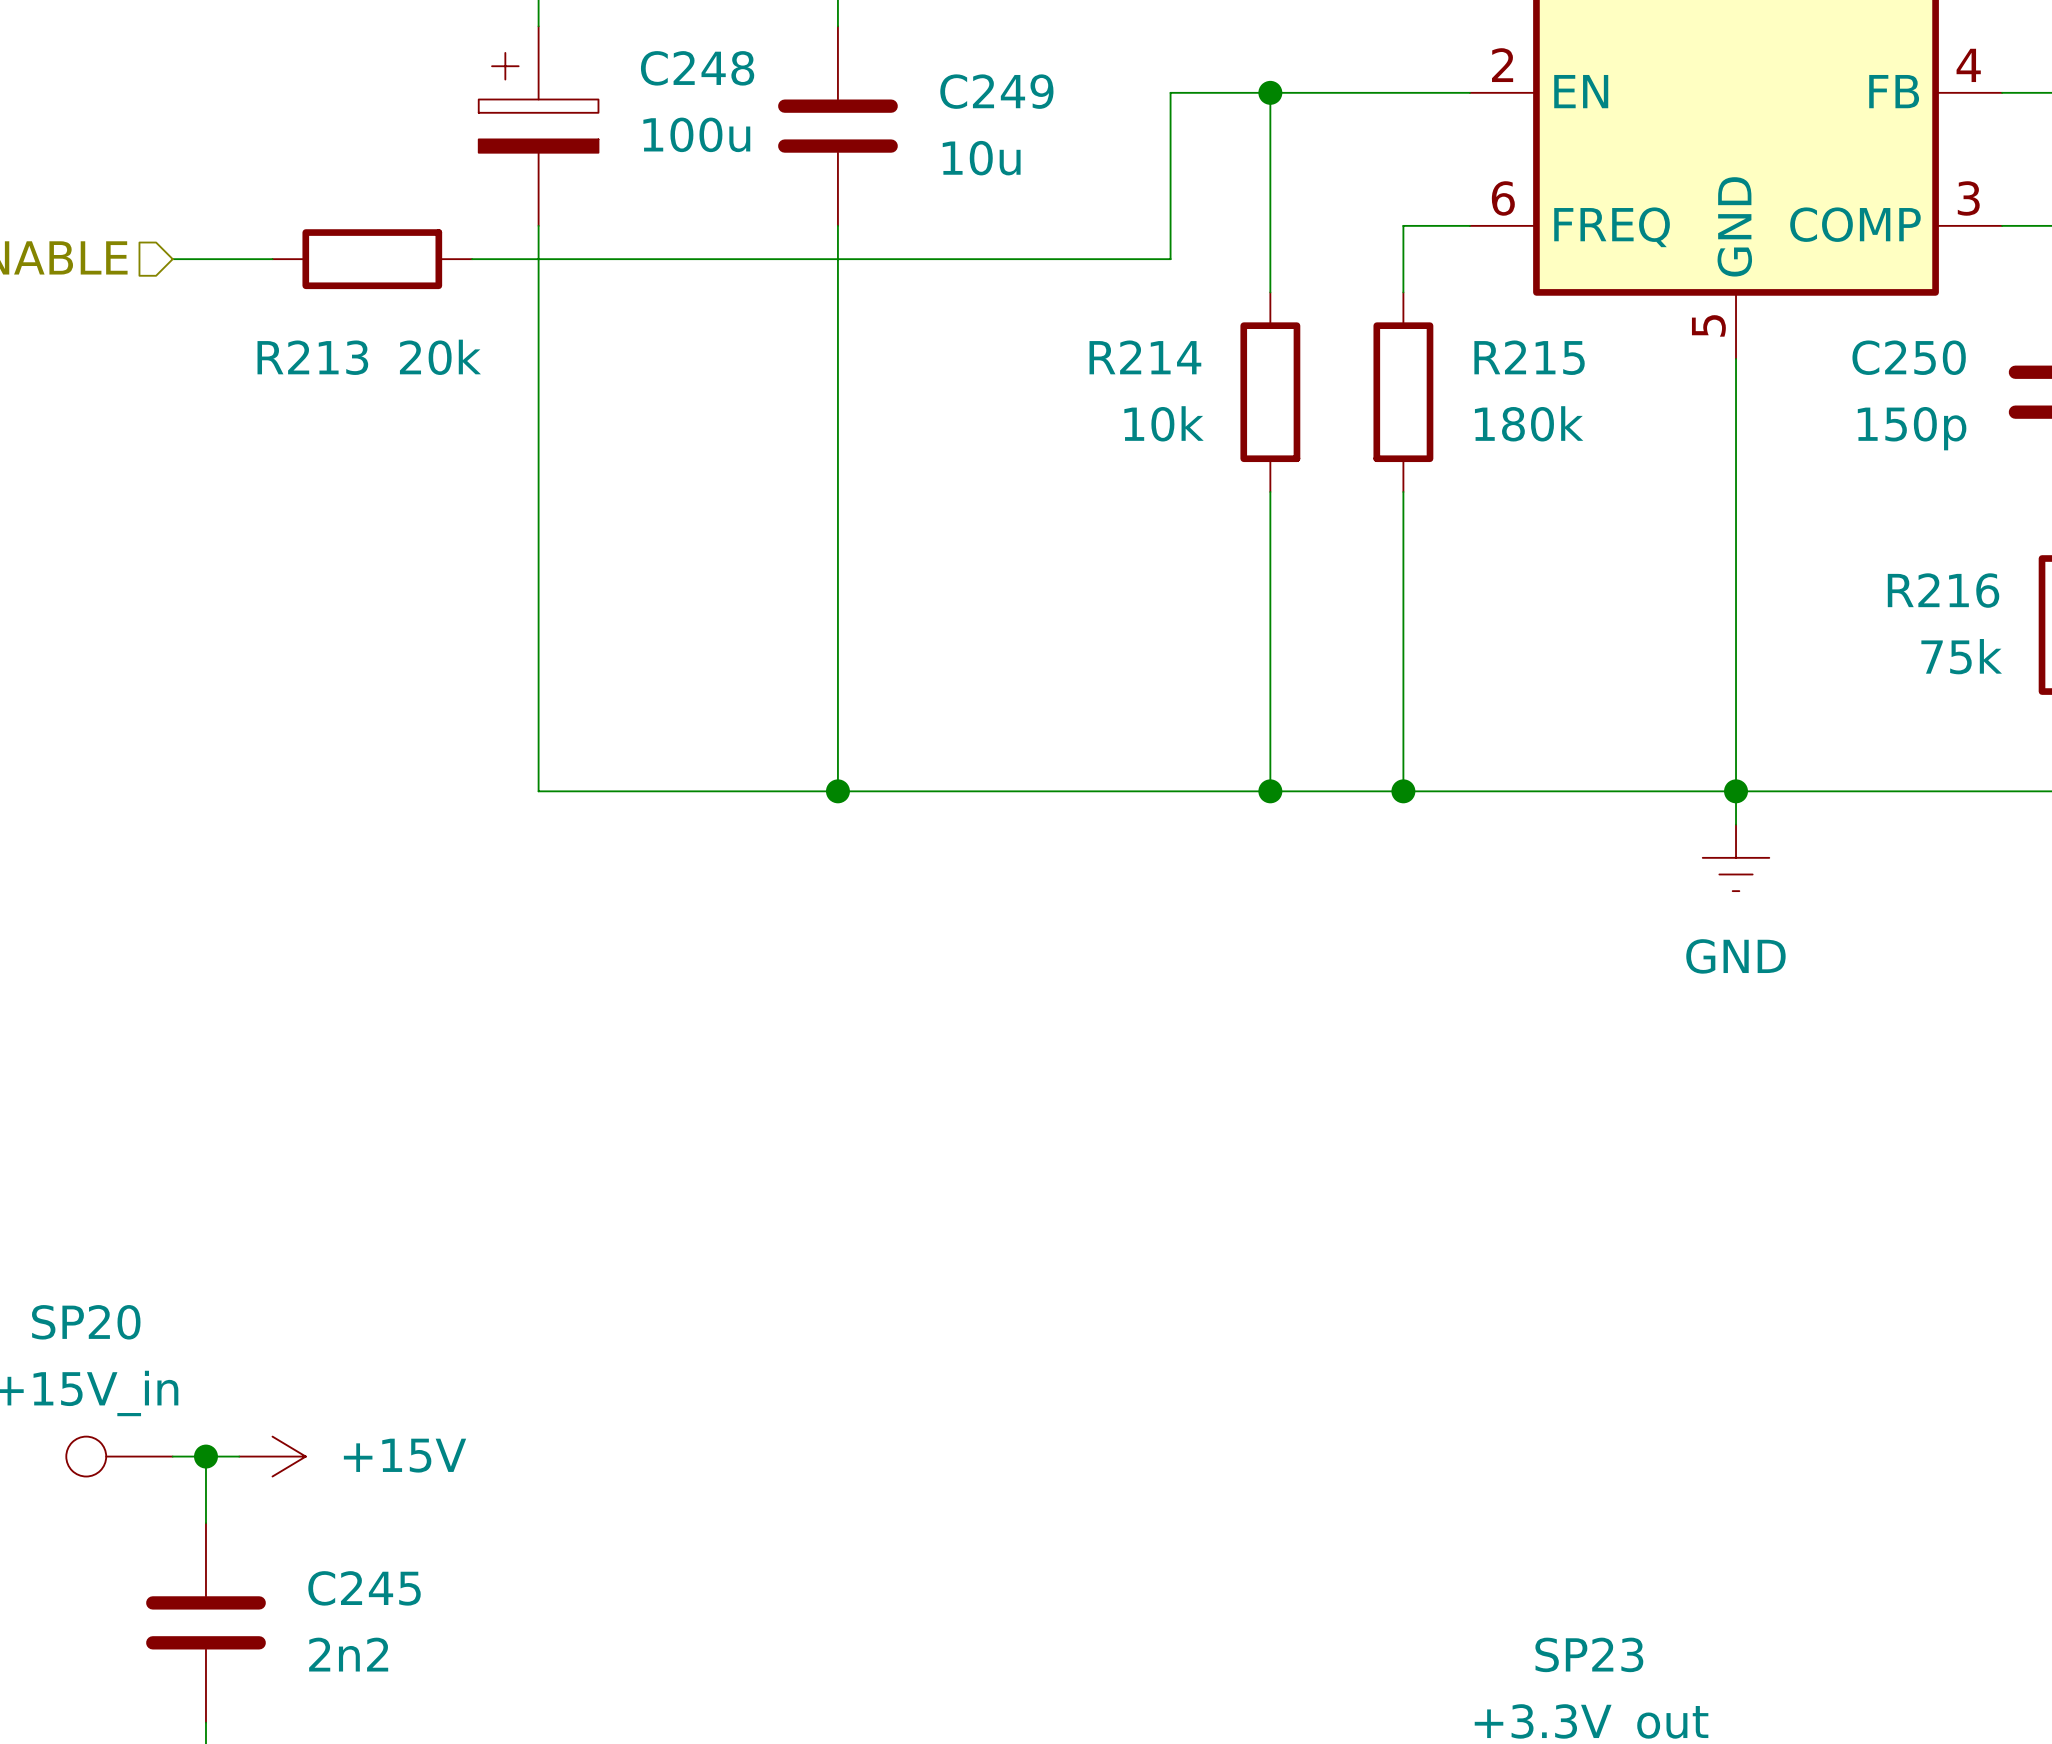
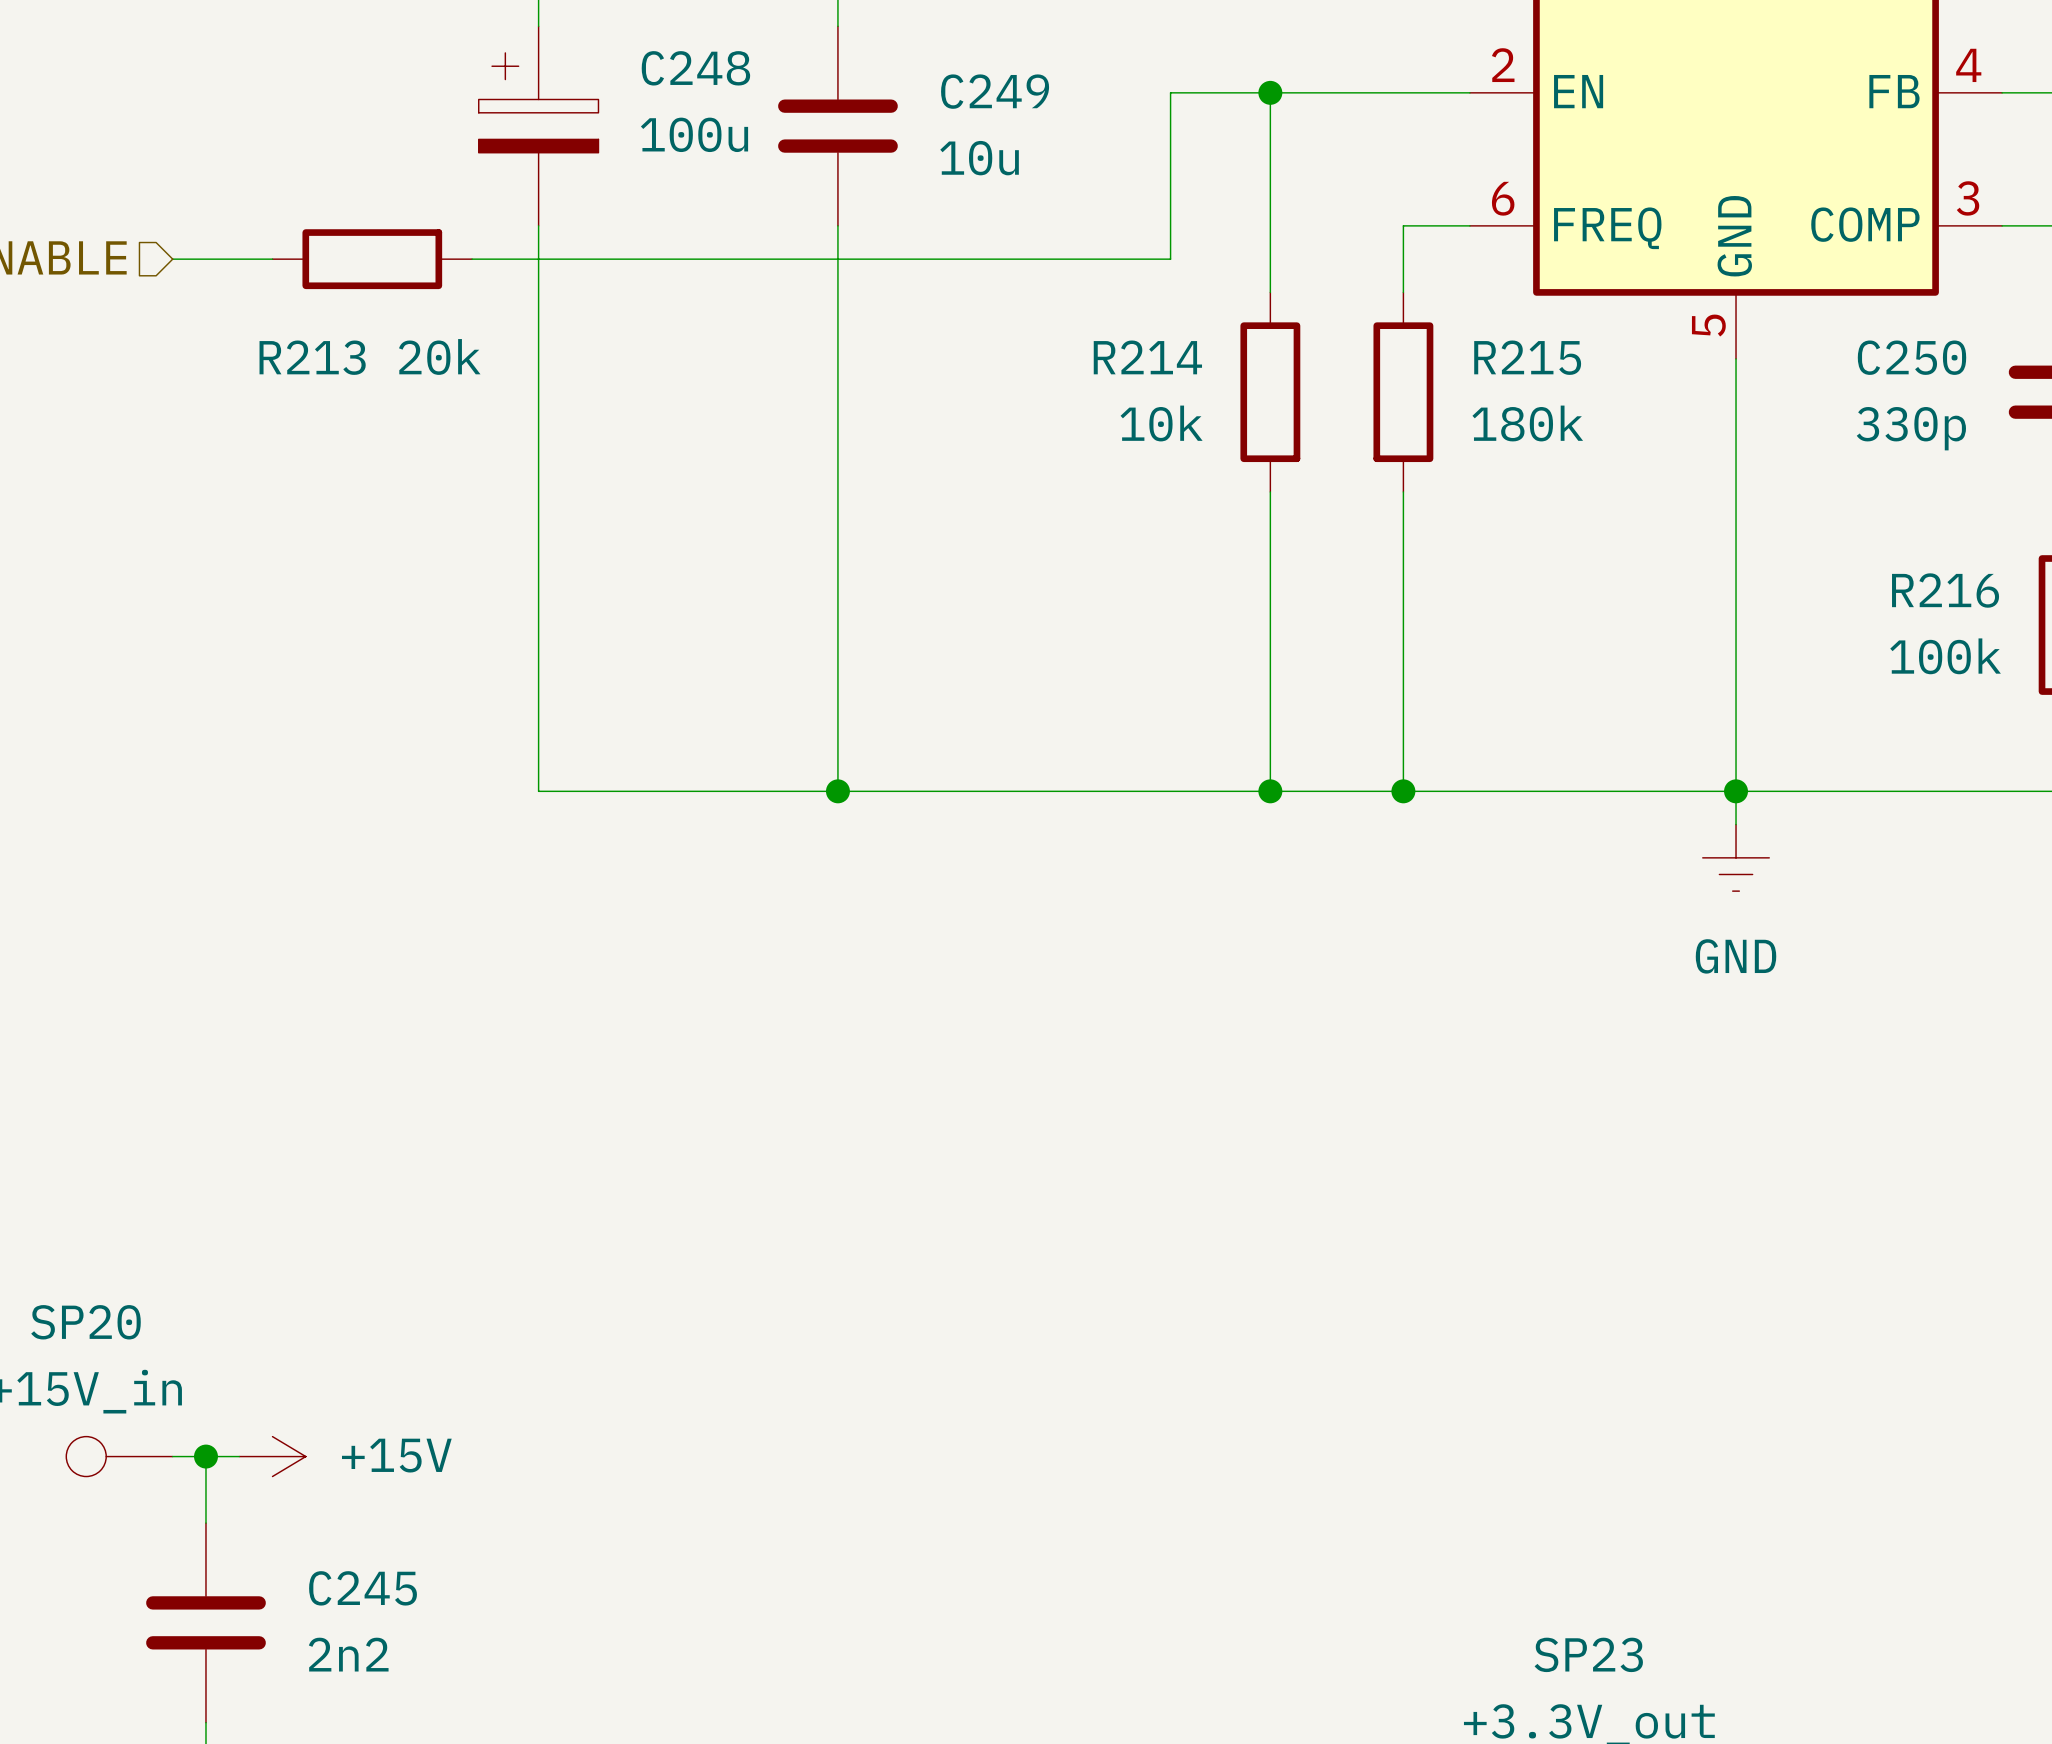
C250 value: 150p (1912, 428) -> 330p (1911, 428)
R216 value: 75k (1961, 656) -> 100k (1945, 656)

